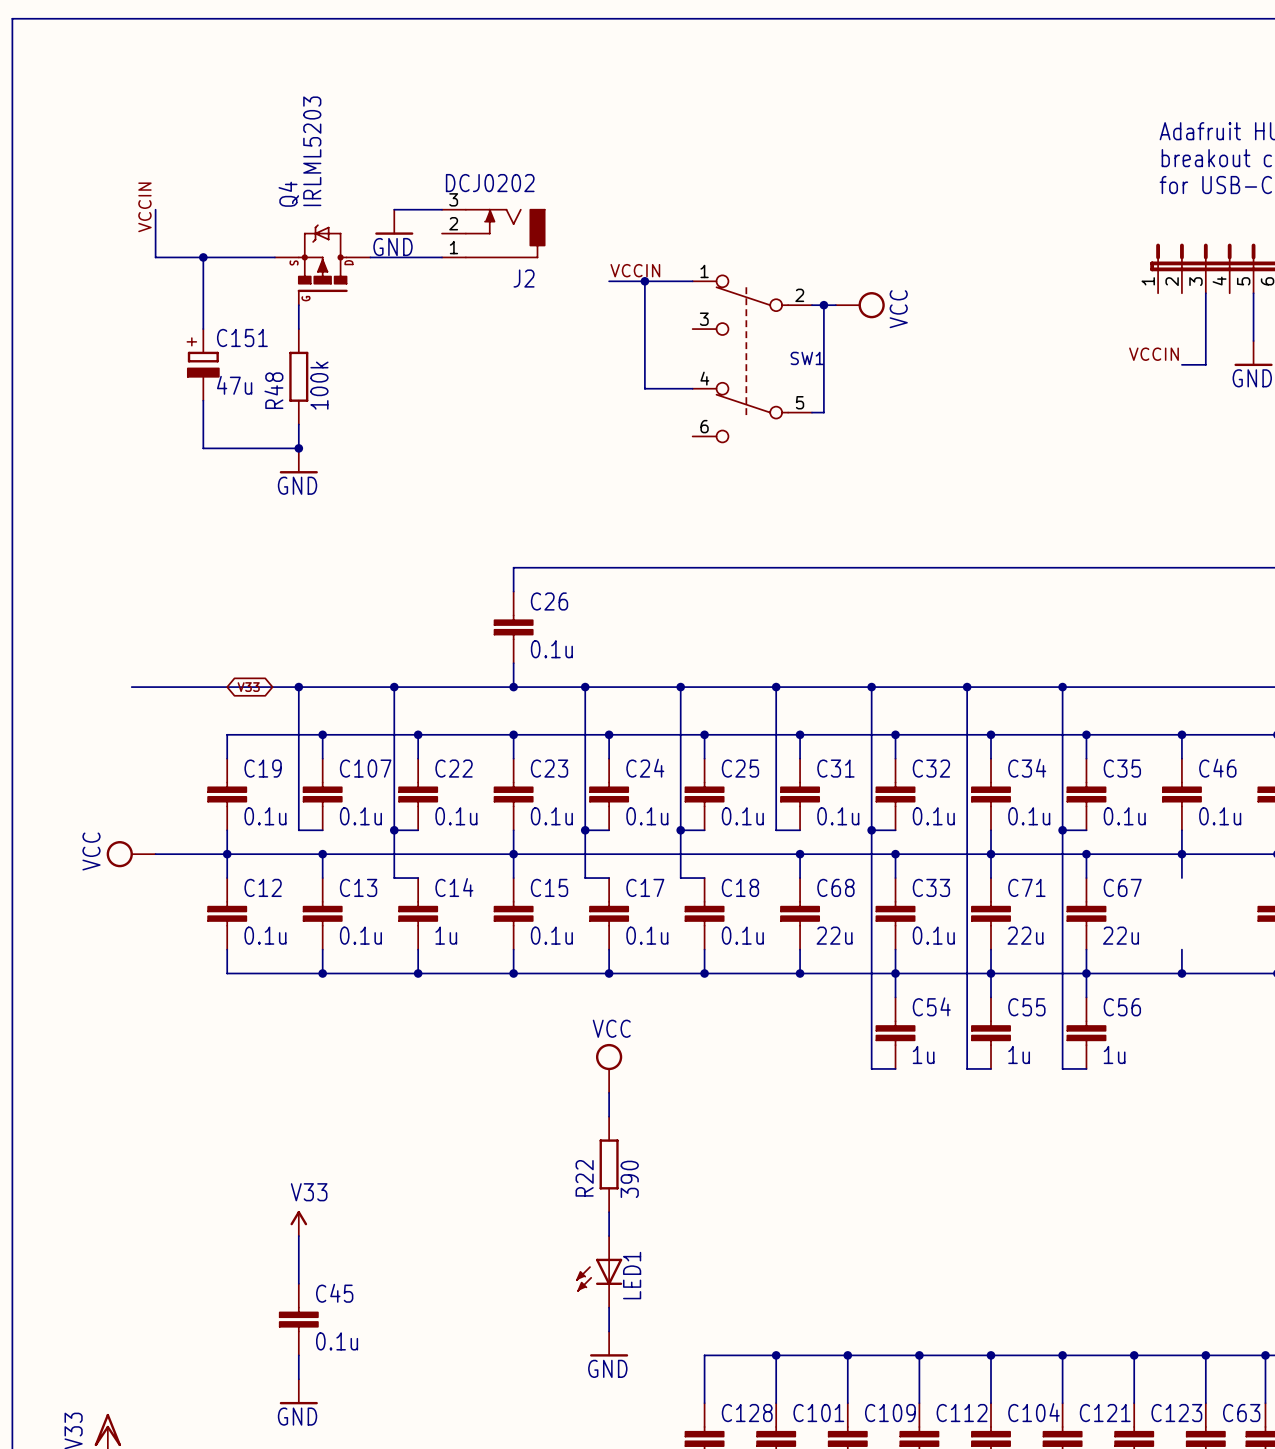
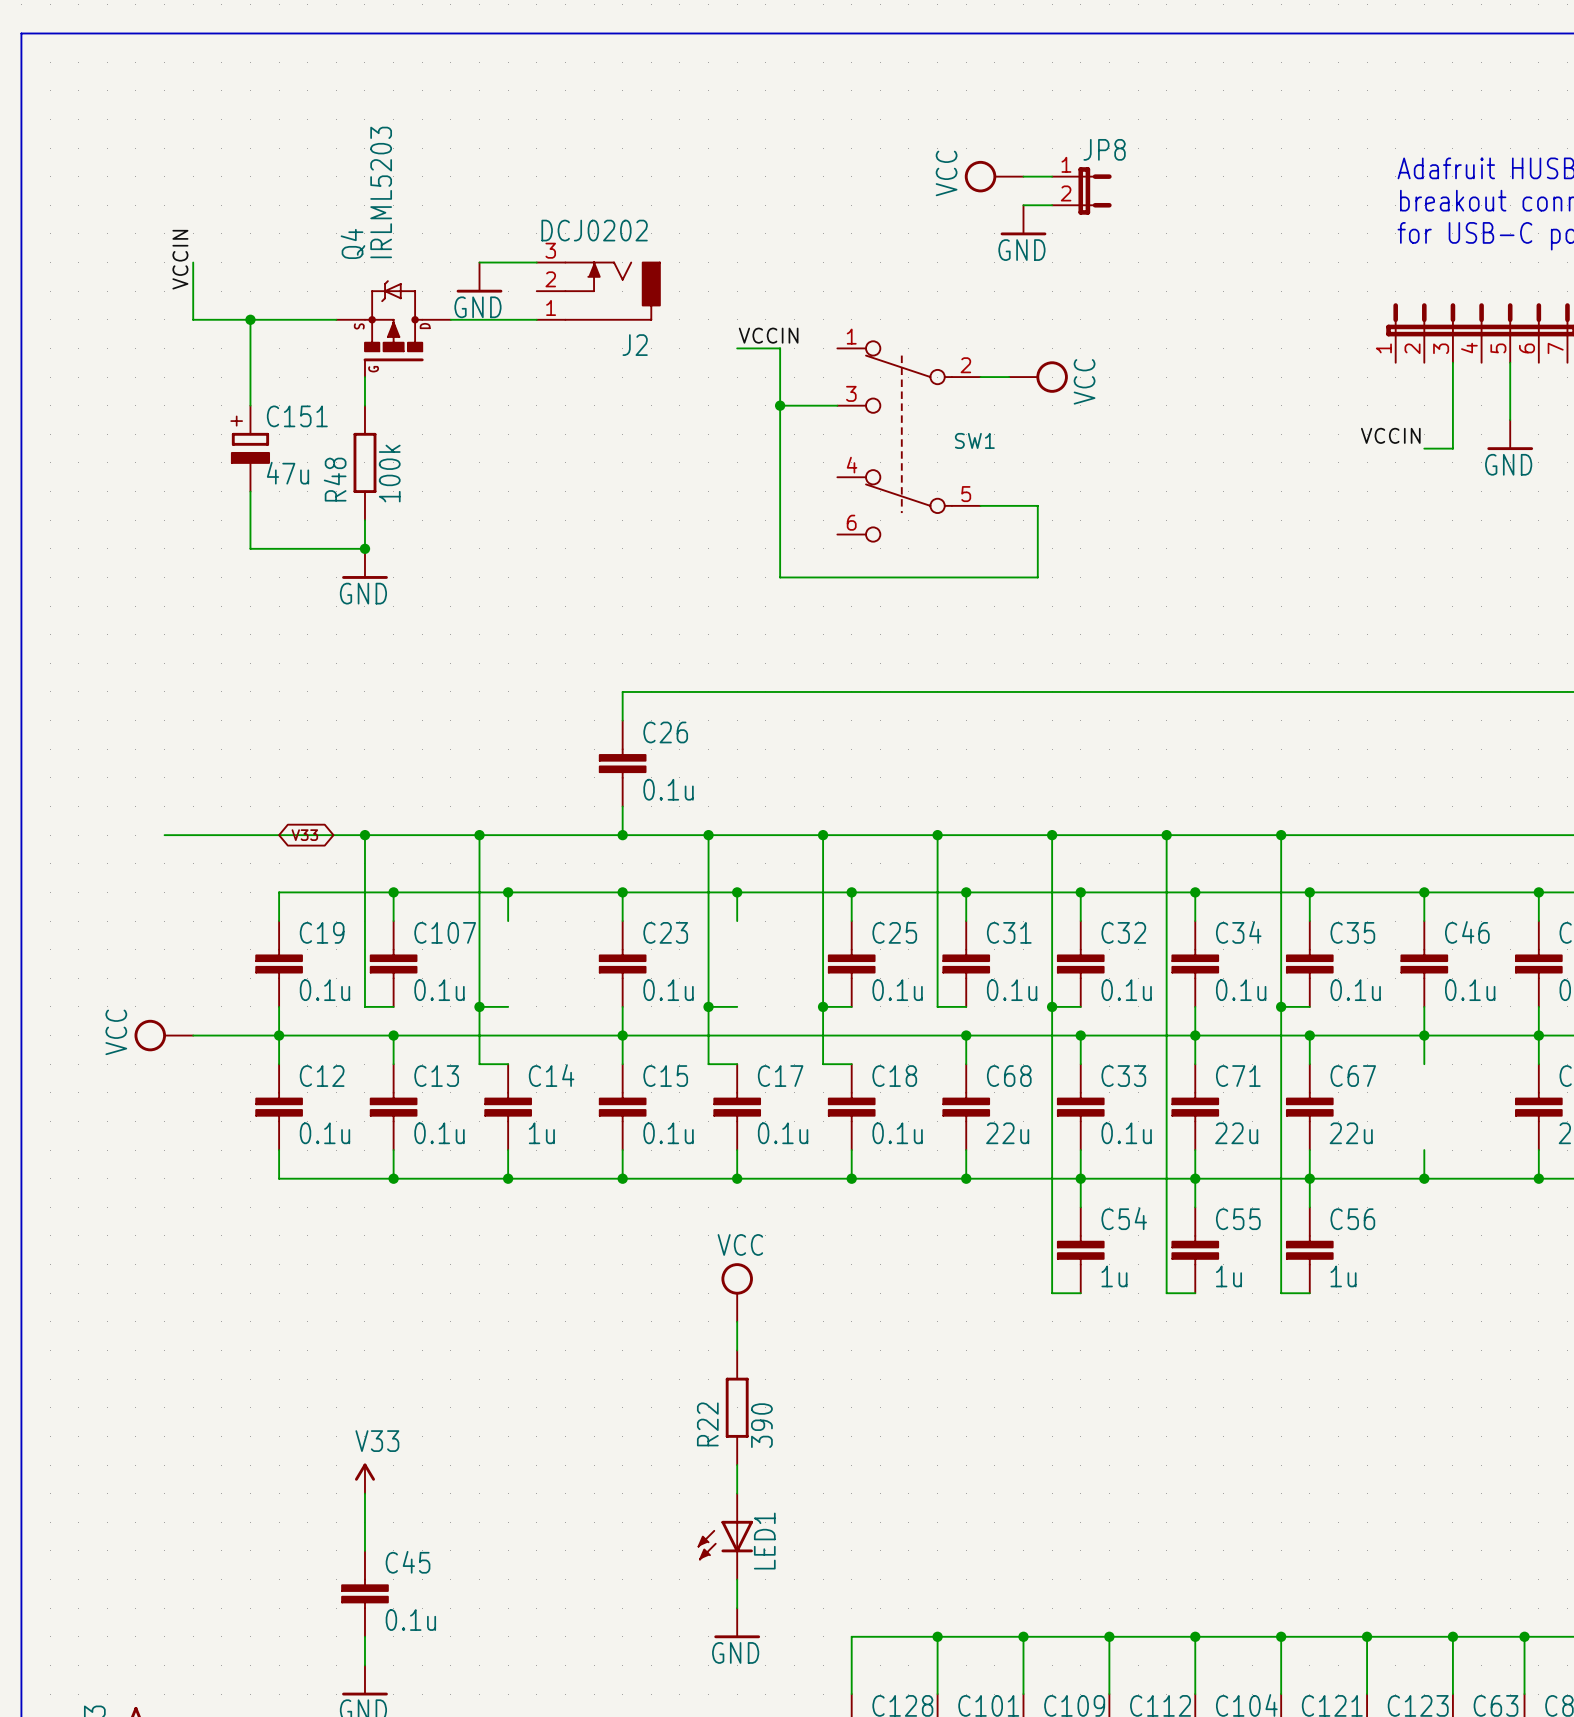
power symbol: none -> VCC (994, 176)
wire: none -> (1023, 176) (1052, 176)
JP8: none -> (1081, 190)
wire: none -> (1023, 205) (1052, 205)
power symbol: none -> GND (1023, 220)
wire: (644, 281) (692, 281) -> (780, 405) (837, 405)
junction position: (644, 281) -> (780, 405)
wire: (823, 305) (823, 412) -> none
junction: (823, 305) -> none
wire: (644, 388) (692, 388) -> (780, 477) (780, 577) (1037, 577) (1037, 505) (994, 505)
C22: 0.1u (418, 794) -> none
C24: 0.1u (609, 794) -> none

